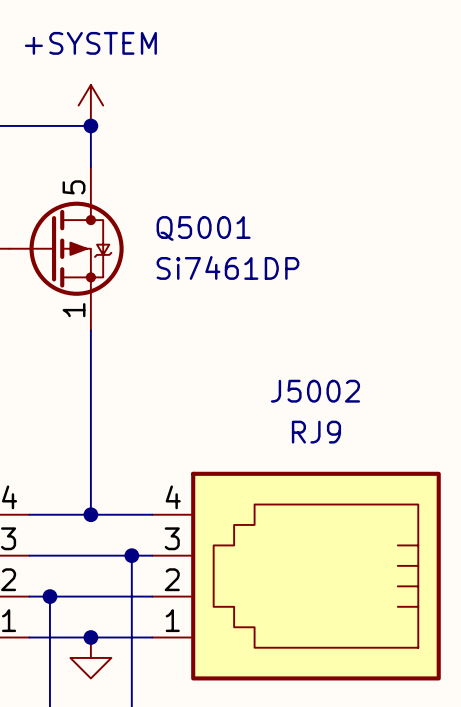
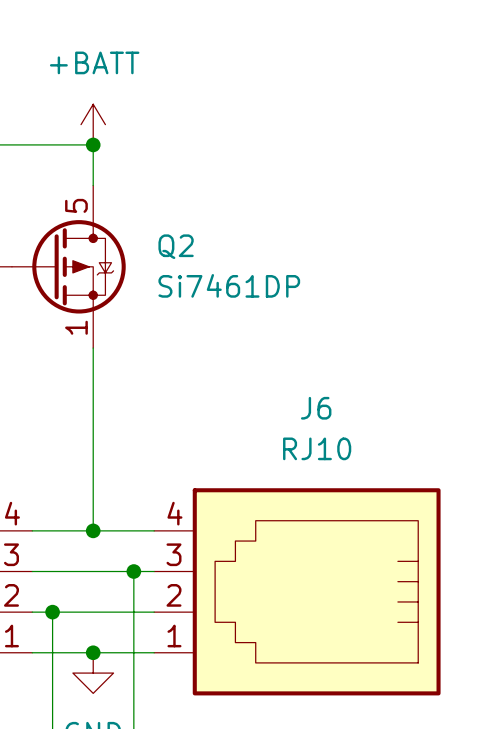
power symbol: +SYSTEM (90, 105) -> +BATT (93, 124)
Q5001 name: Q5001 (203, 228) -> Q2 (176, 246)
J5002 name: J5002 (315, 391) -> J6 (316, 408)
J5002 value: RJ9 (316, 432) -> RJ10 (317, 448)

